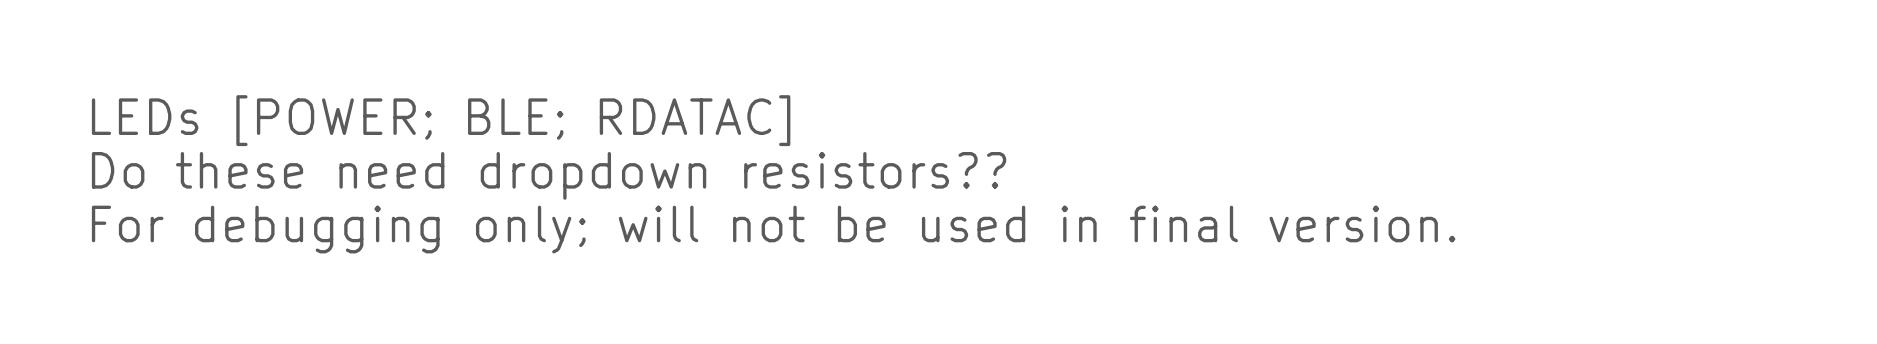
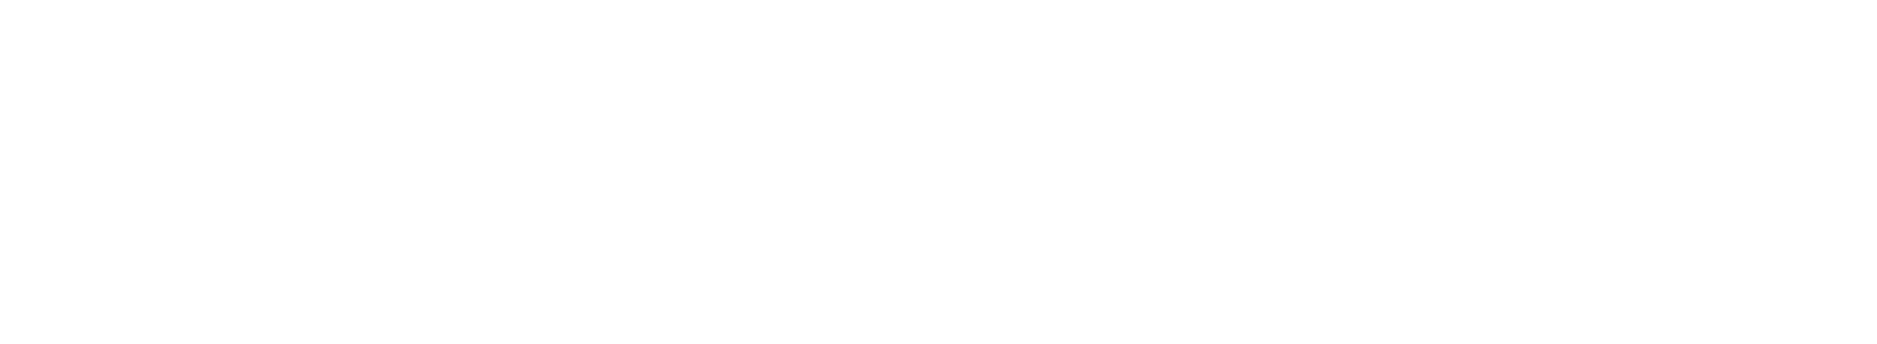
text: LEDs [POWER; BLE; RDATAC] (441, 120) -> none
text: Do these need dropdown resistors?? (549, 175) -> none
text: For debugging only; will not be used in final version. (773, 229) -> none

